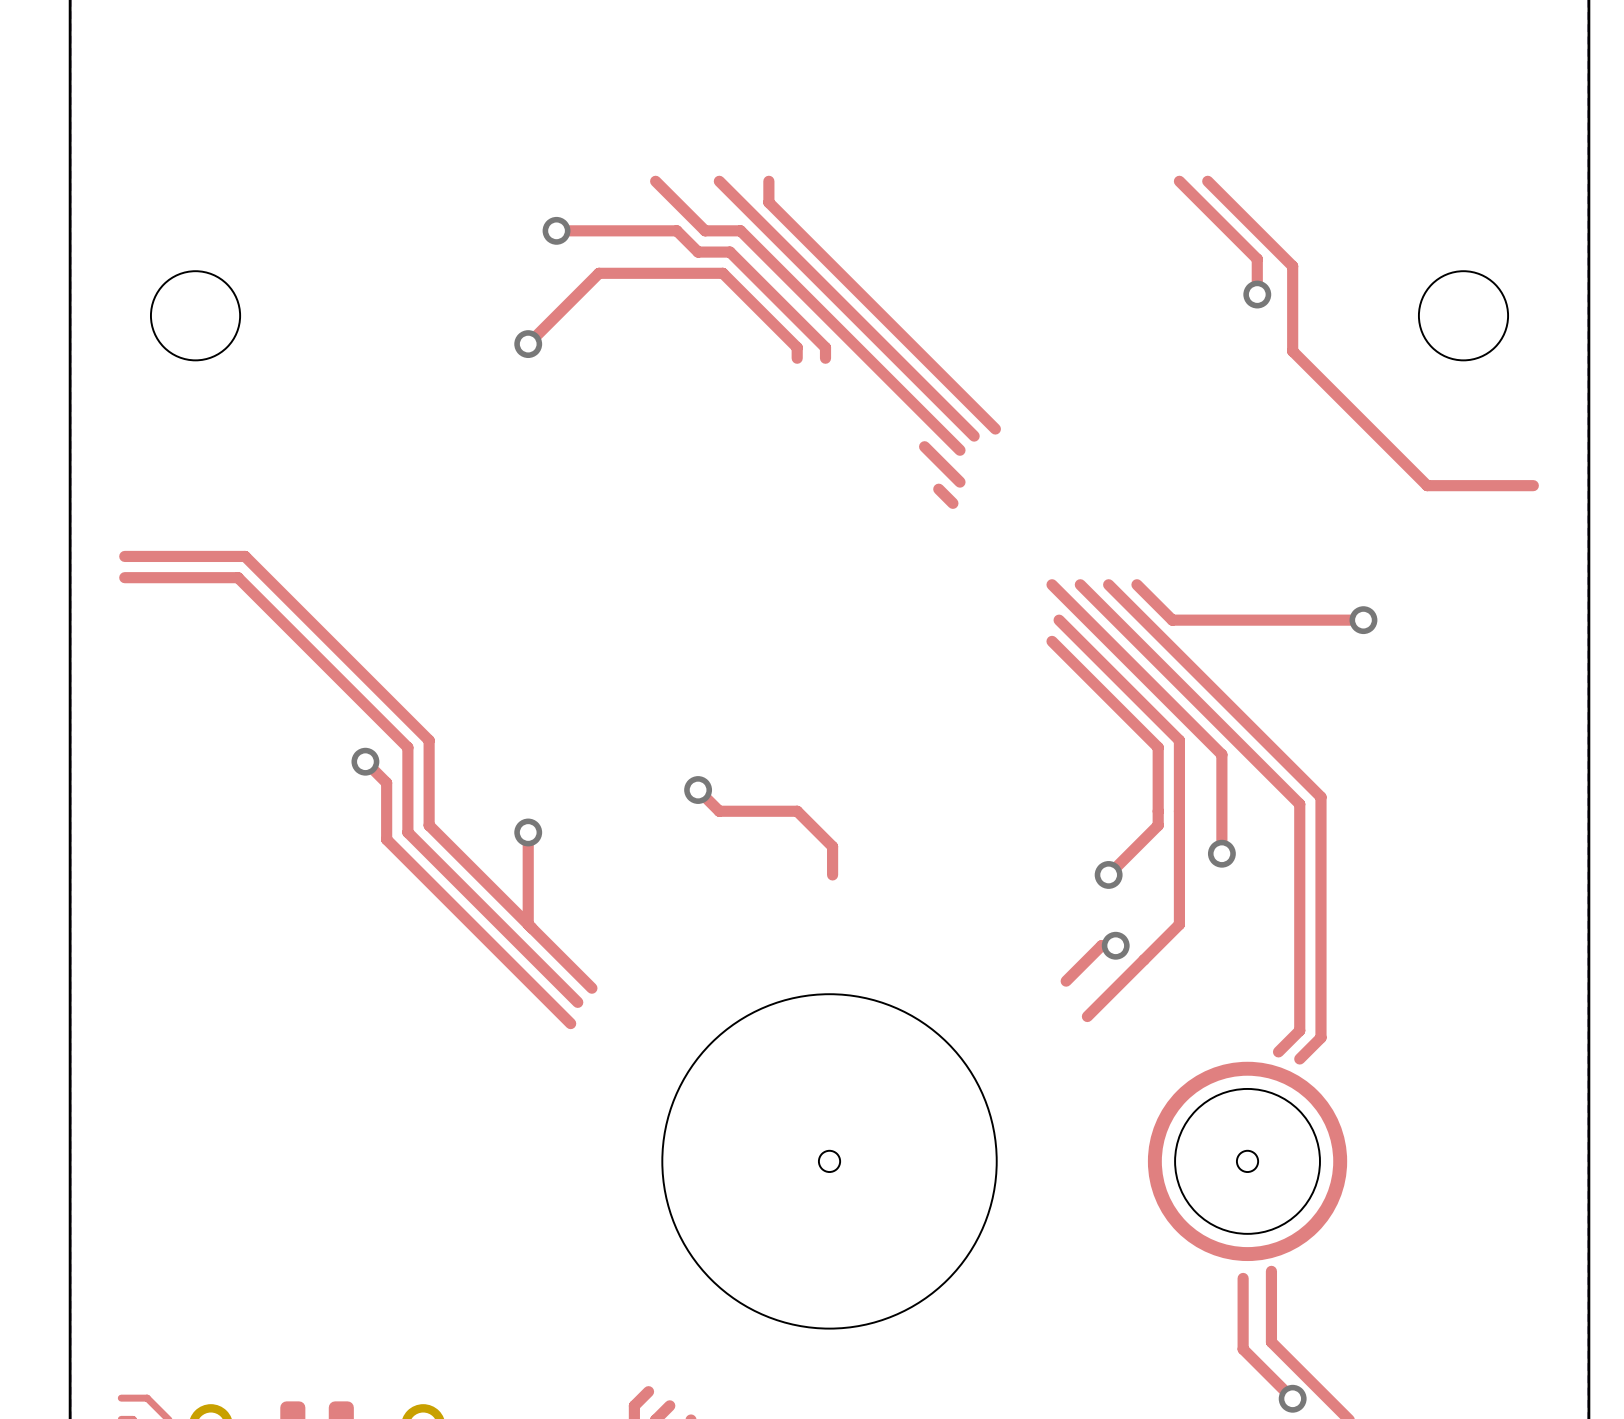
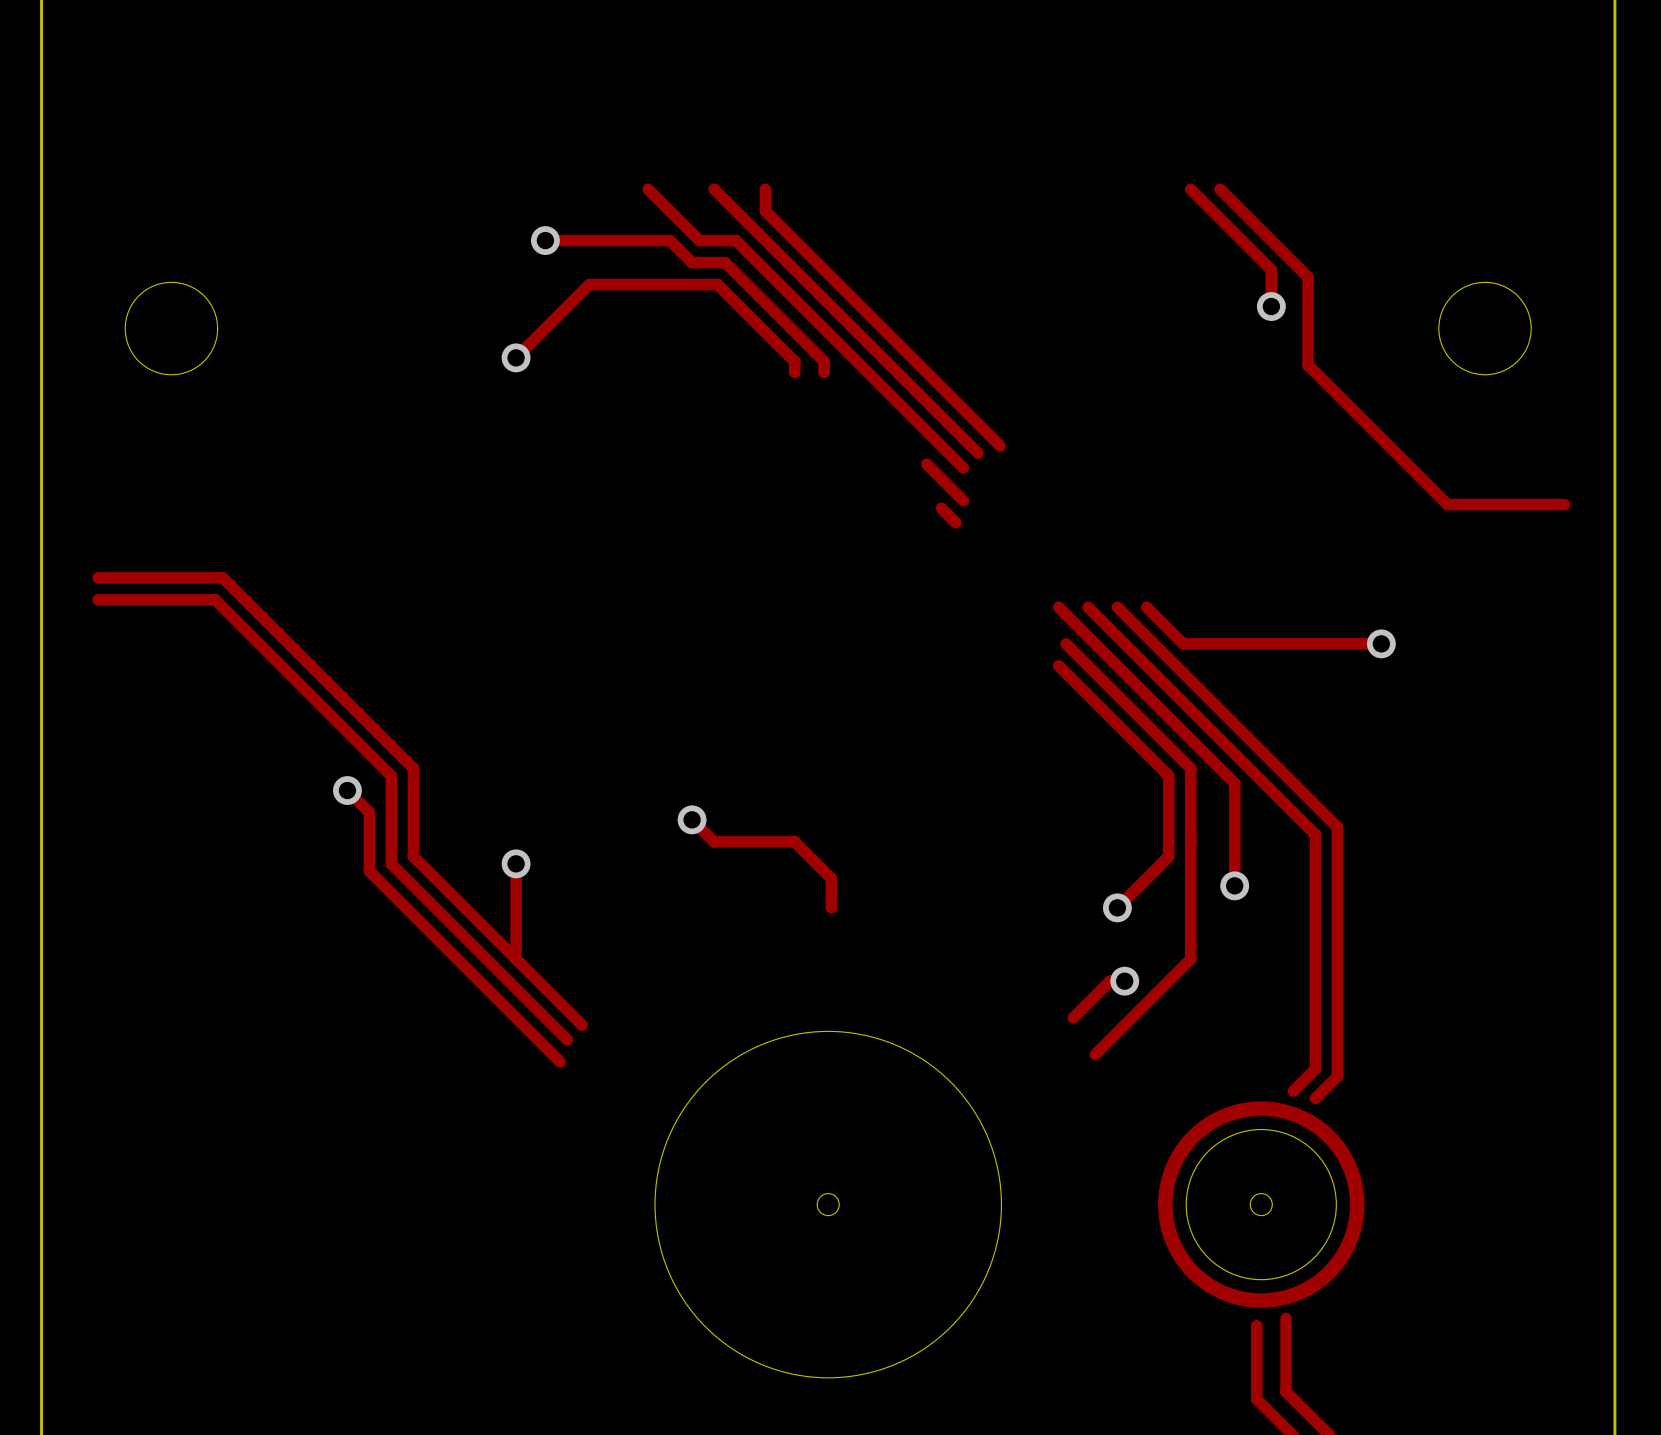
top track: none -> (1564, 504) (1557, 504)

